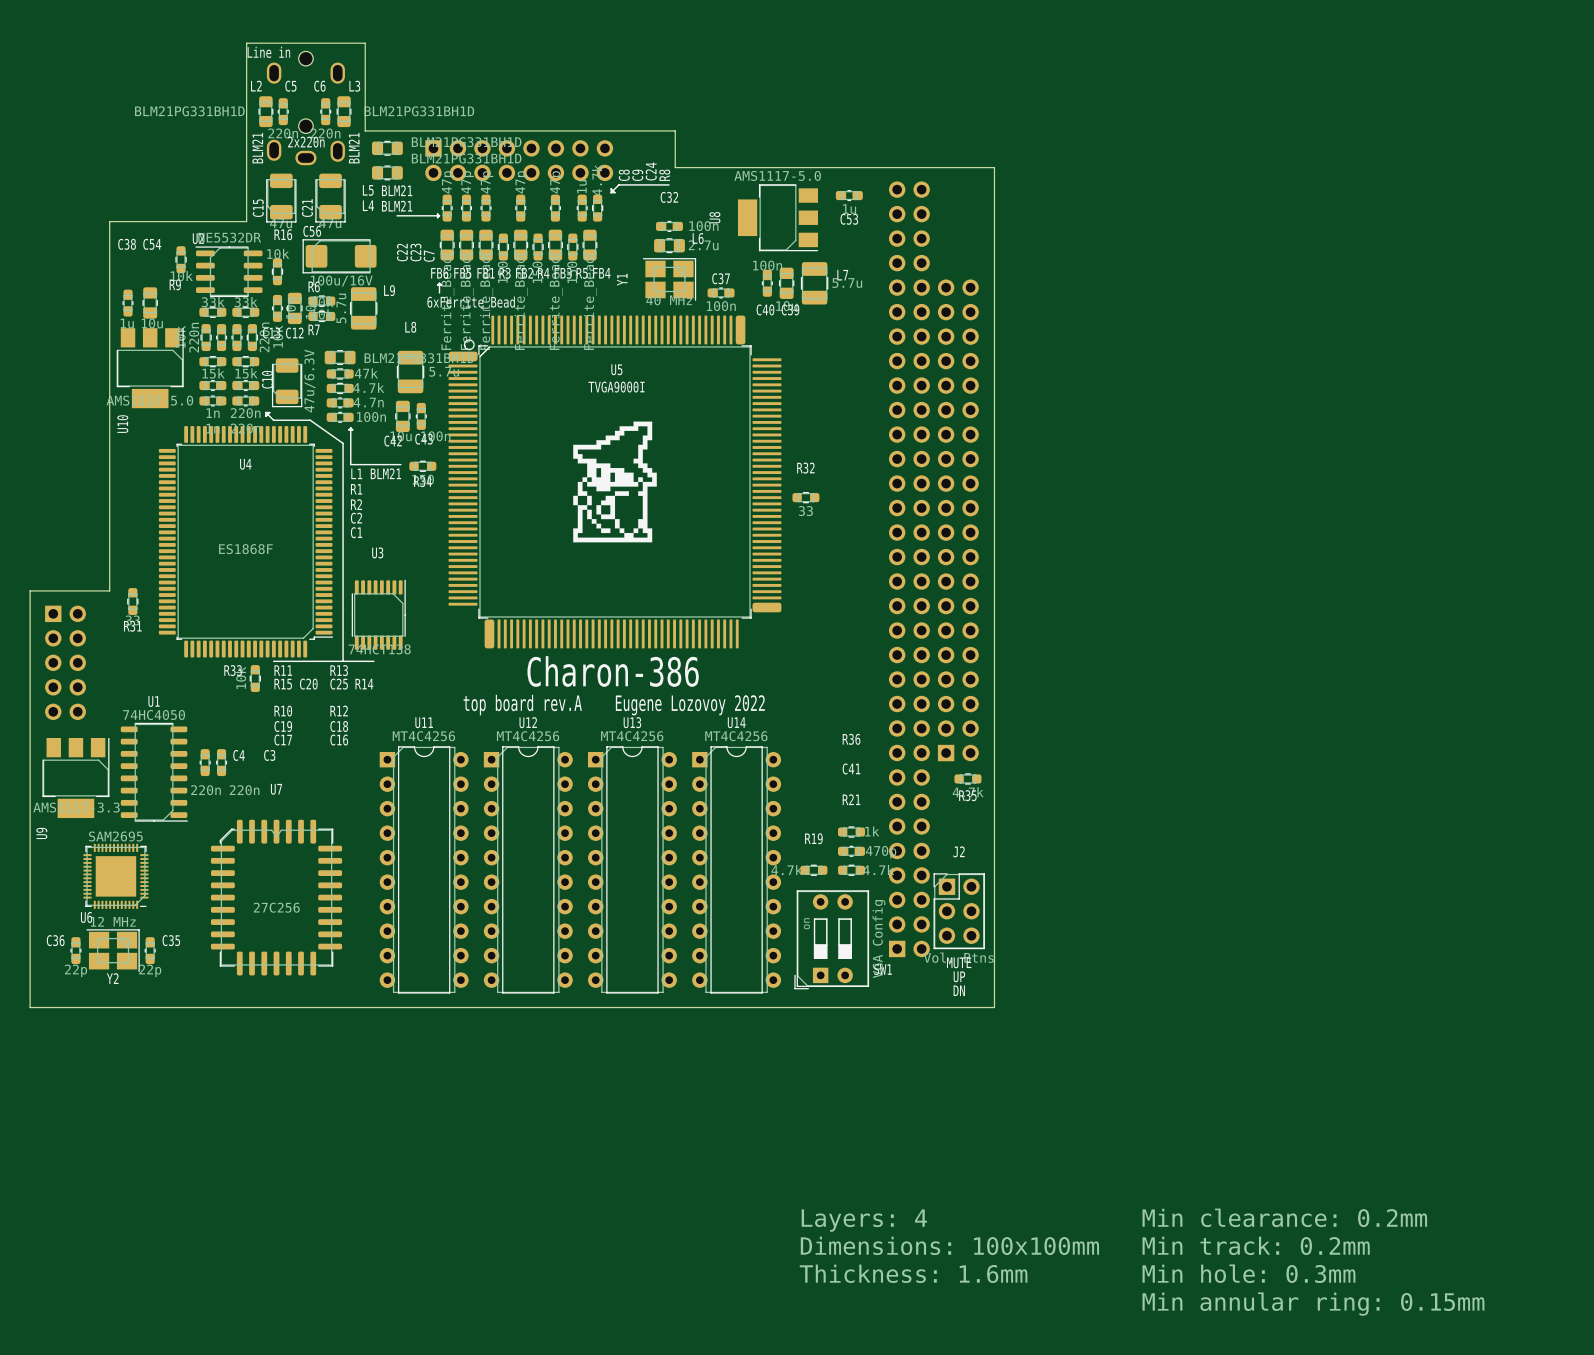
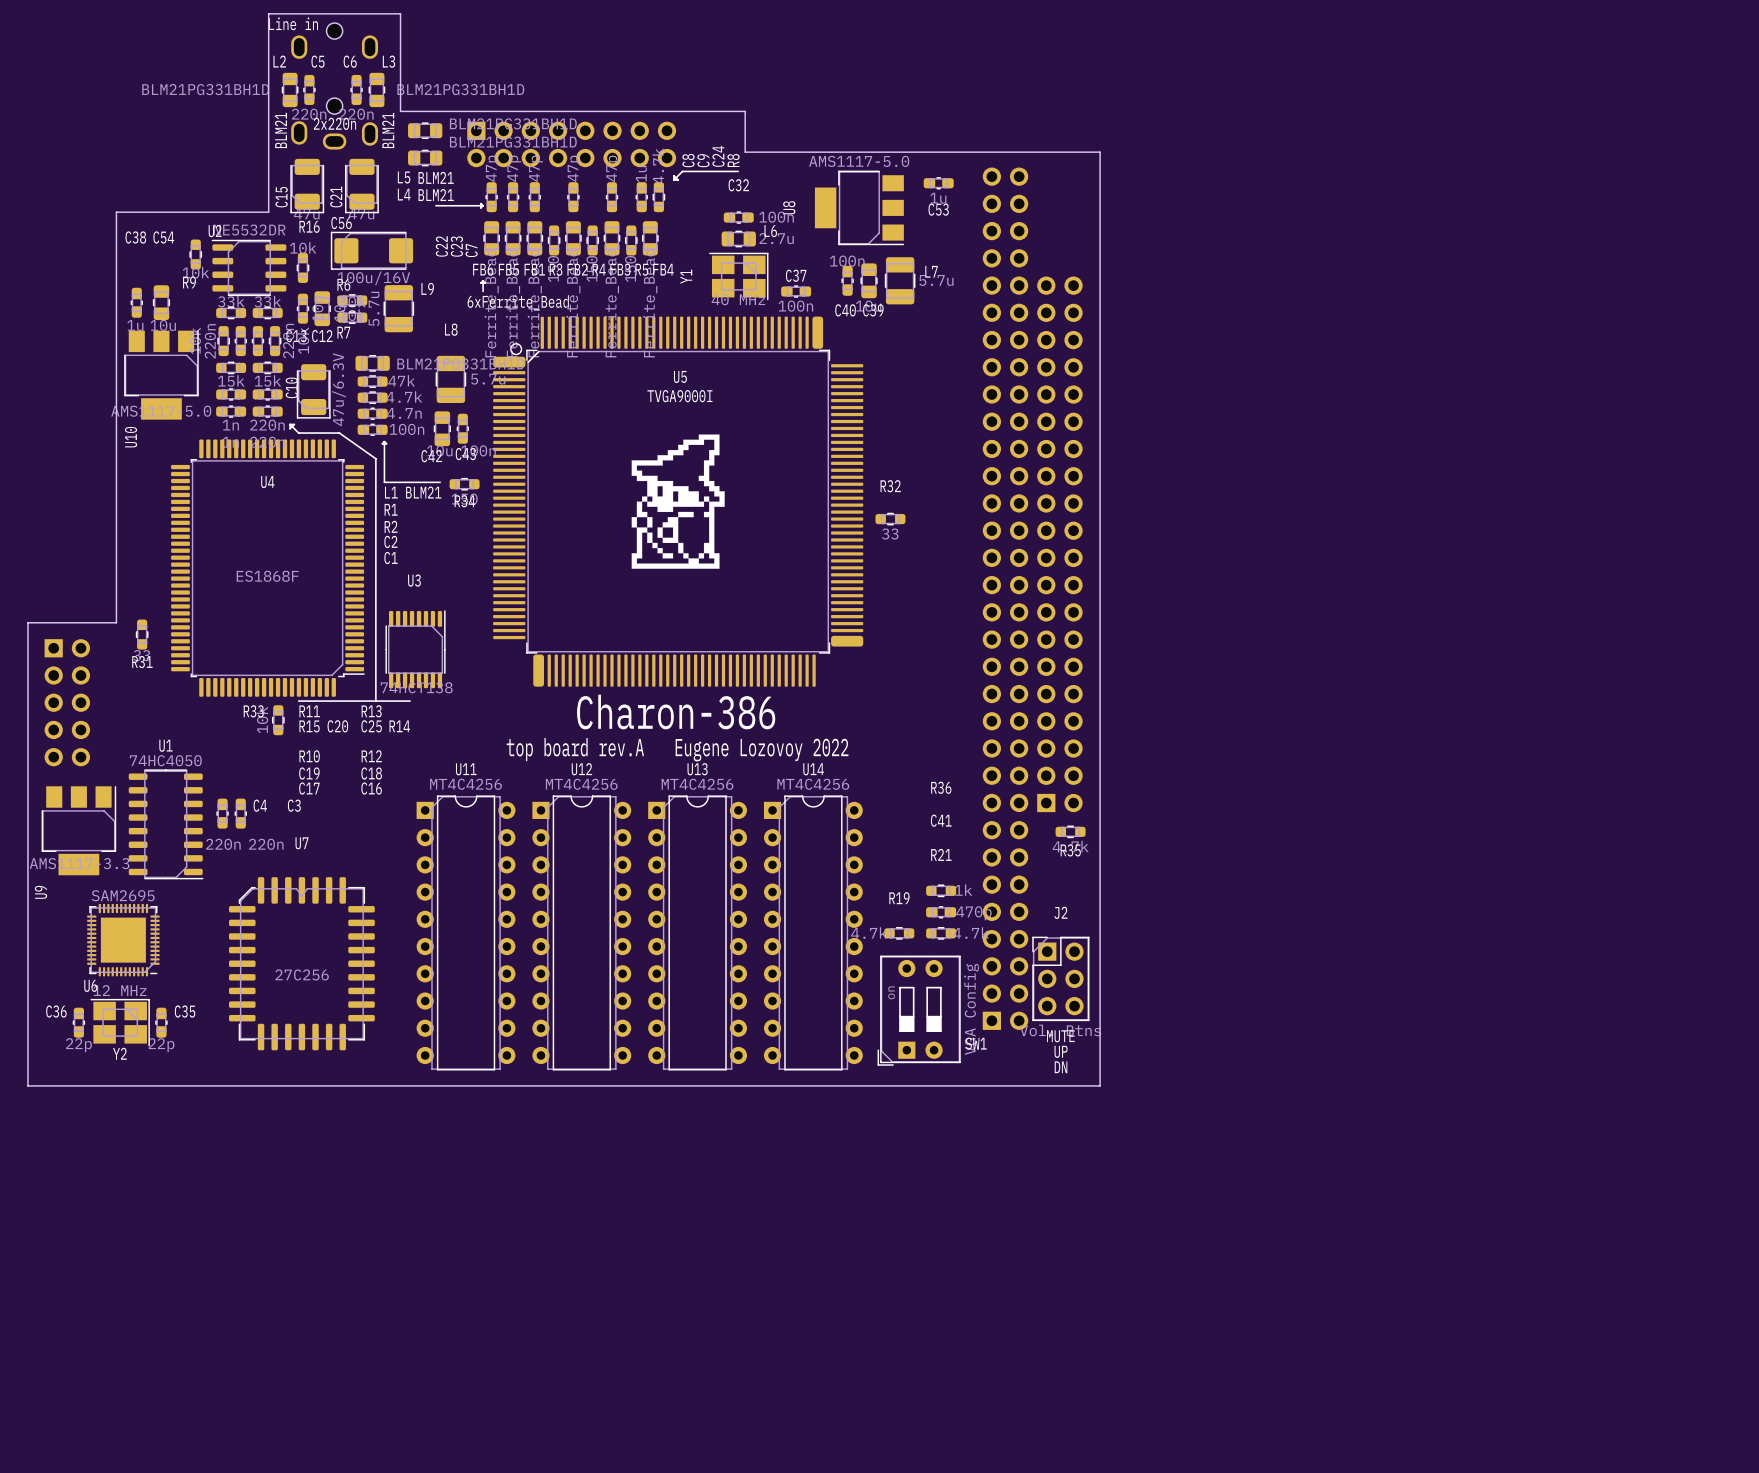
text: Min clearance: 0.2mm (1284, 1217) -> none
text: Layers: 4 (864, 1220) -> none
text: Dimensions: 100x100mm (949, 1245) -> none
text: Min track: 0.2mm (1256, 1245) -> none
text: Thickness: 1.6mm (913, 1273) -> none
text: Min hole: 0.3mm (1248, 1273) -> none
text: Min annular ring: 0.15mm (1313, 1304) -> none

